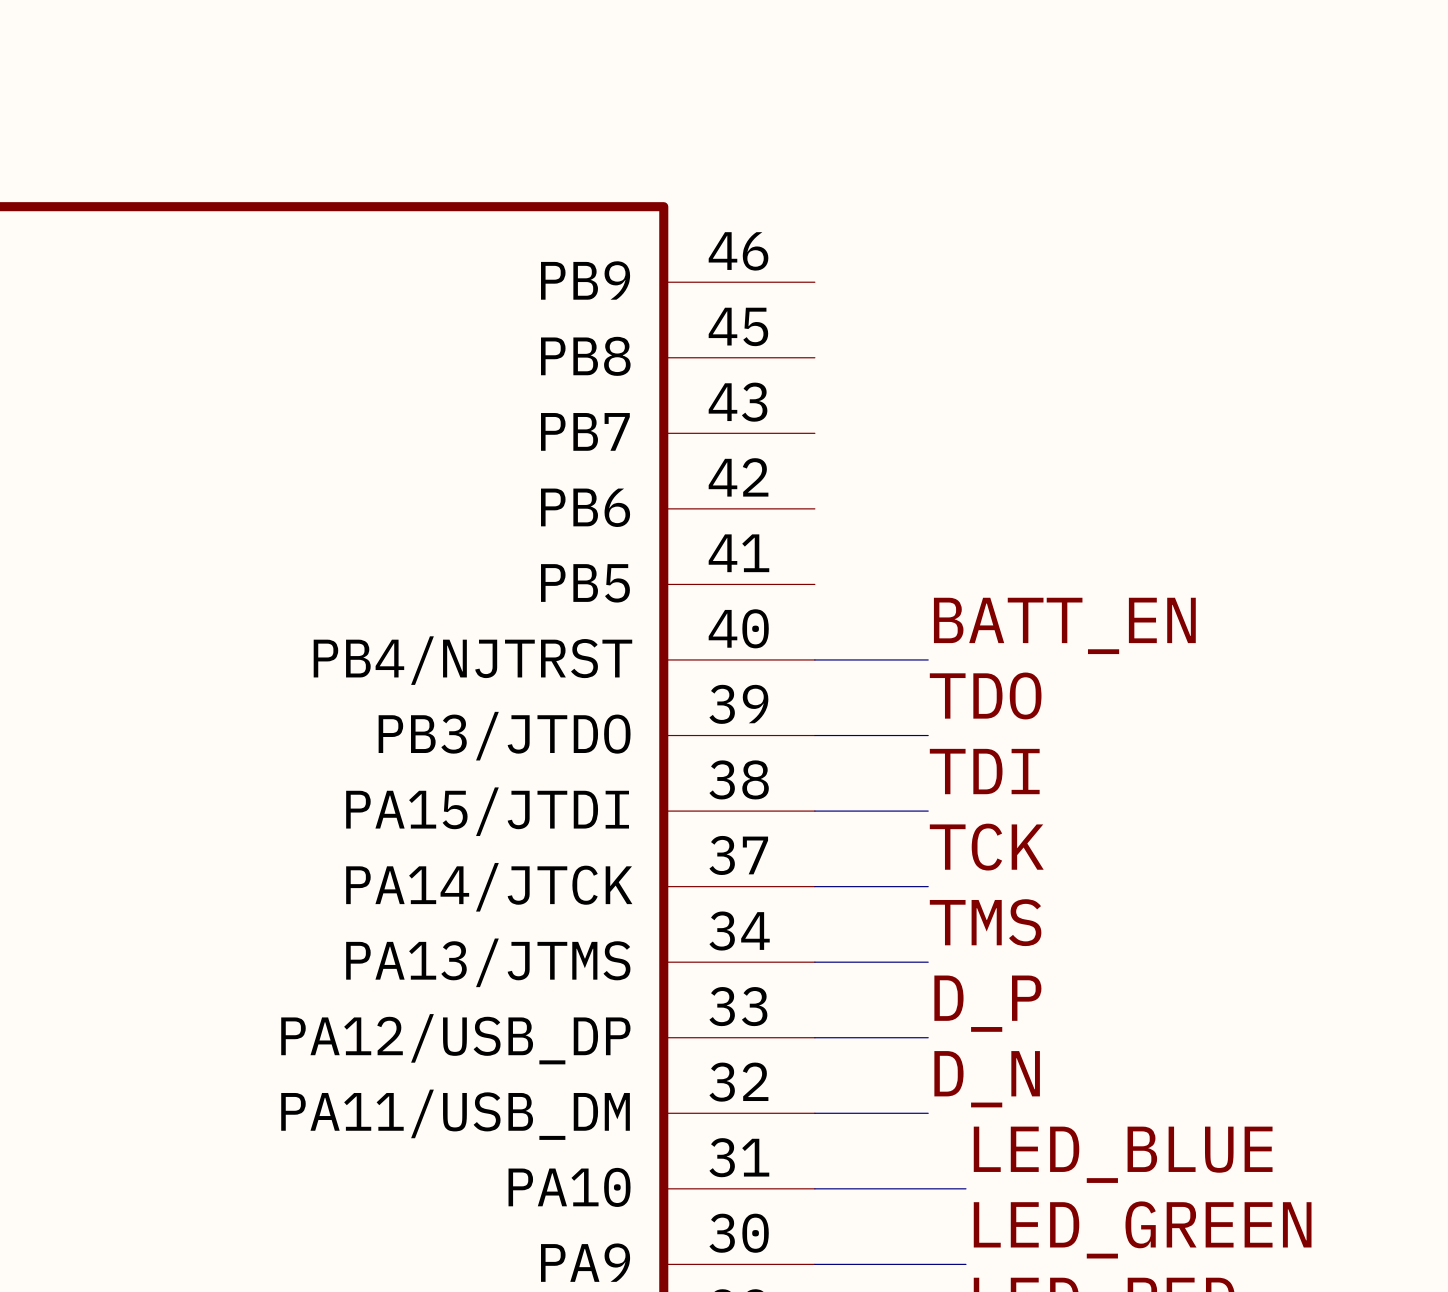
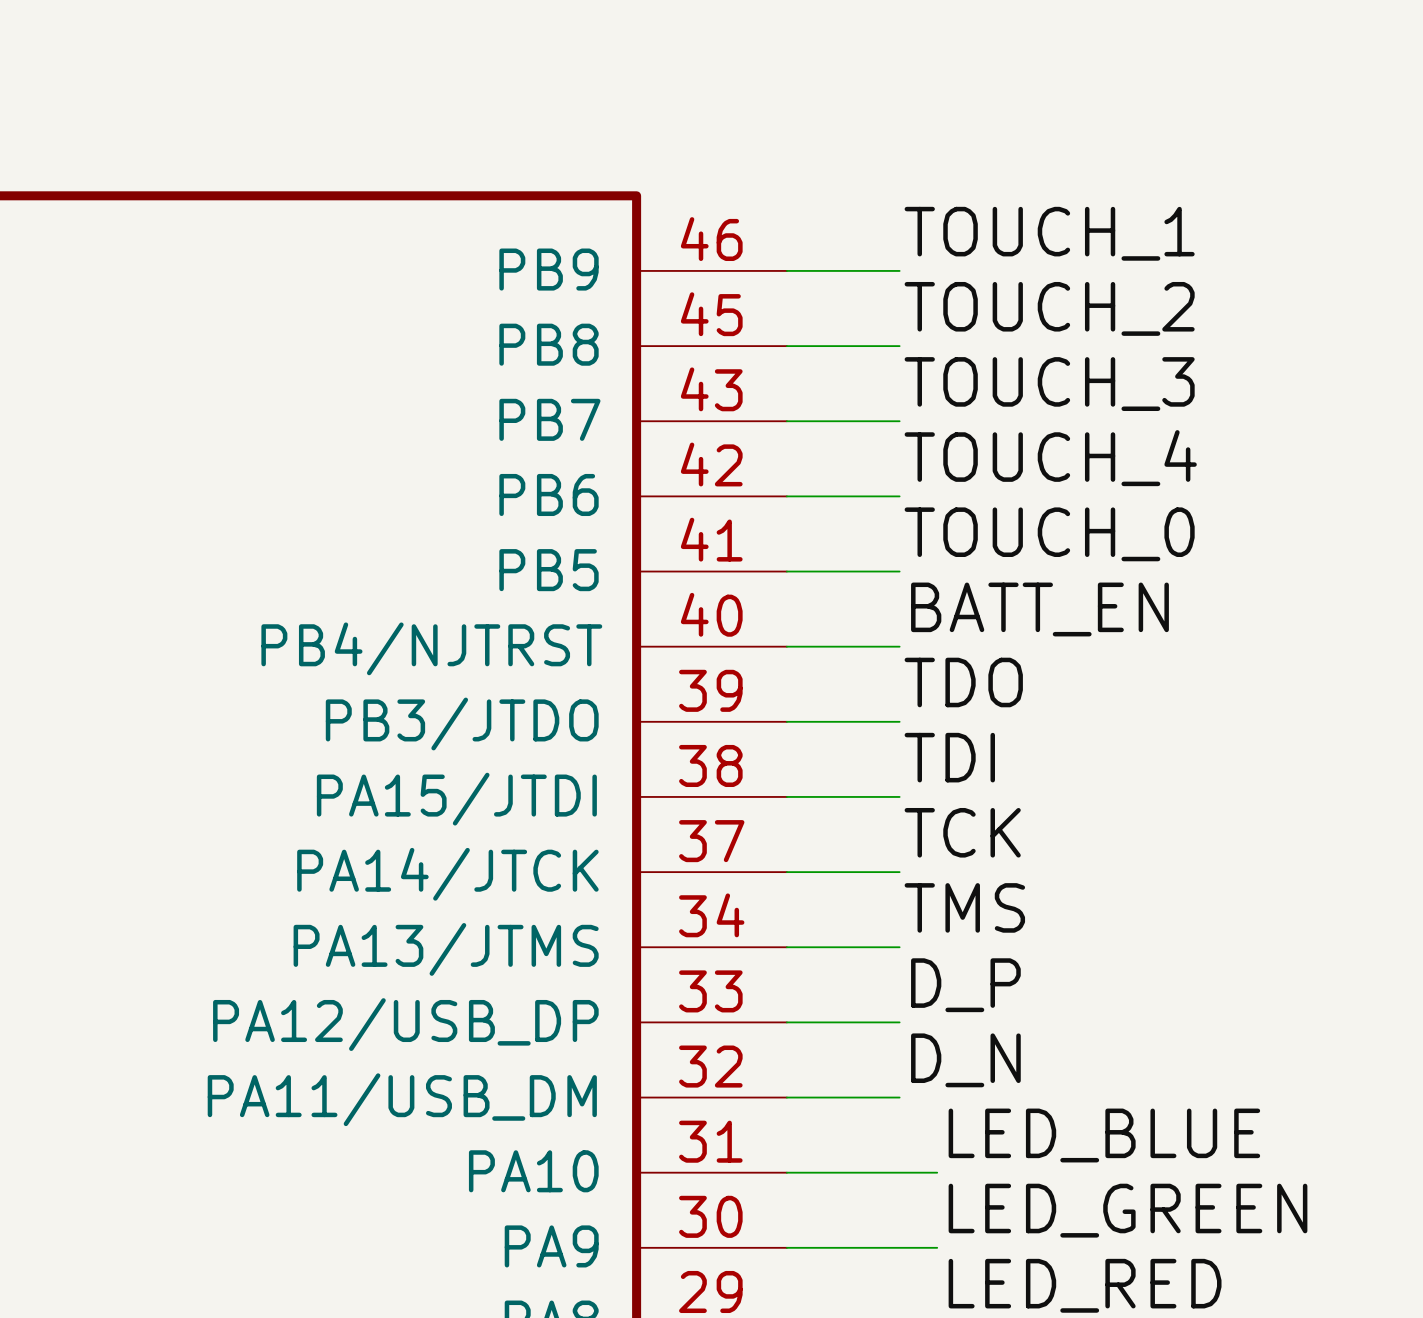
label: none -> TOUCH_1 (1049, 233)
wire: none -> (786, 270) (899, 270)
label: none -> TOUCH_2 (1049, 308)
wire: none -> (786, 346) (899, 346)
label: none -> TOUCH_3 (1049, 384)
wire: none -> (786, 421) (899, 421)
label: none -> TOUCH_4 (1050, 458)
wire: none -> (786, 496) (899, 496)
label: none -> TOUCH_0 (1049, 534)
wire: none -> (786, 571) (899, 571)

